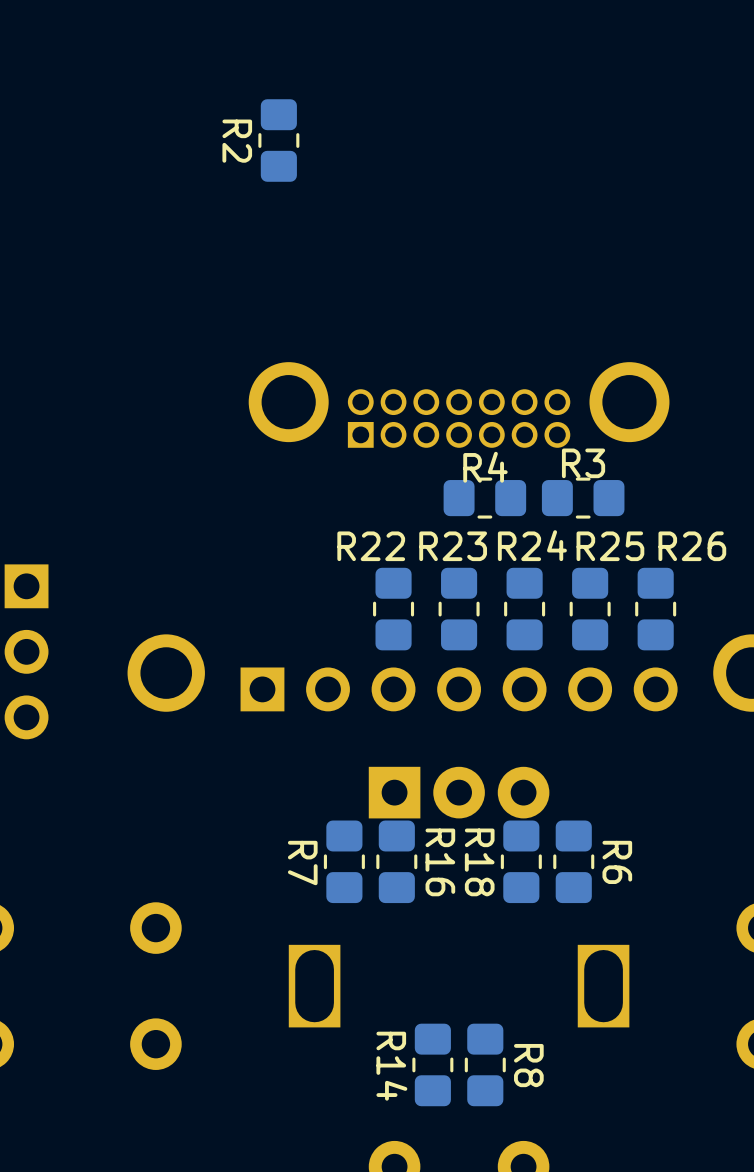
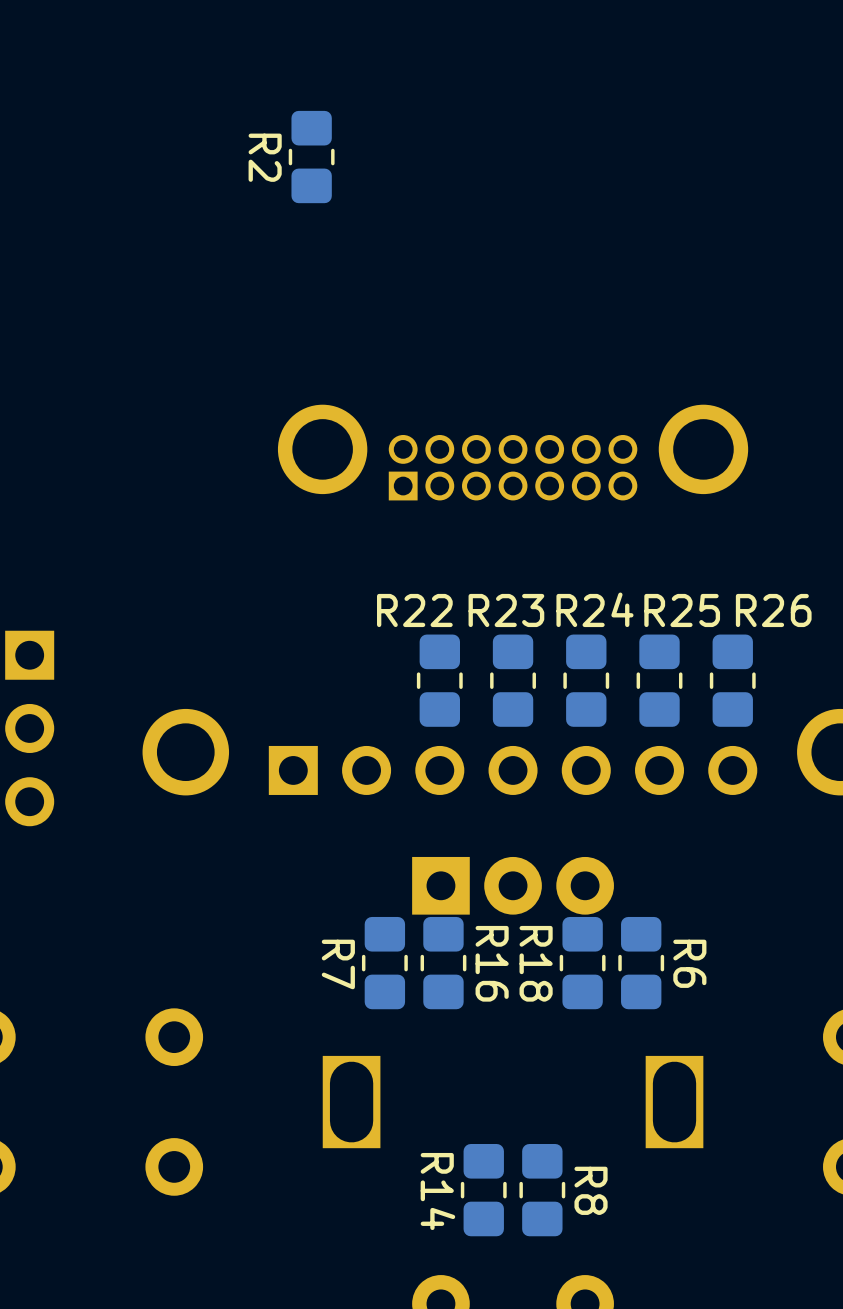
R4: (484, 498) -> none
R3: (583, 498) -> none

